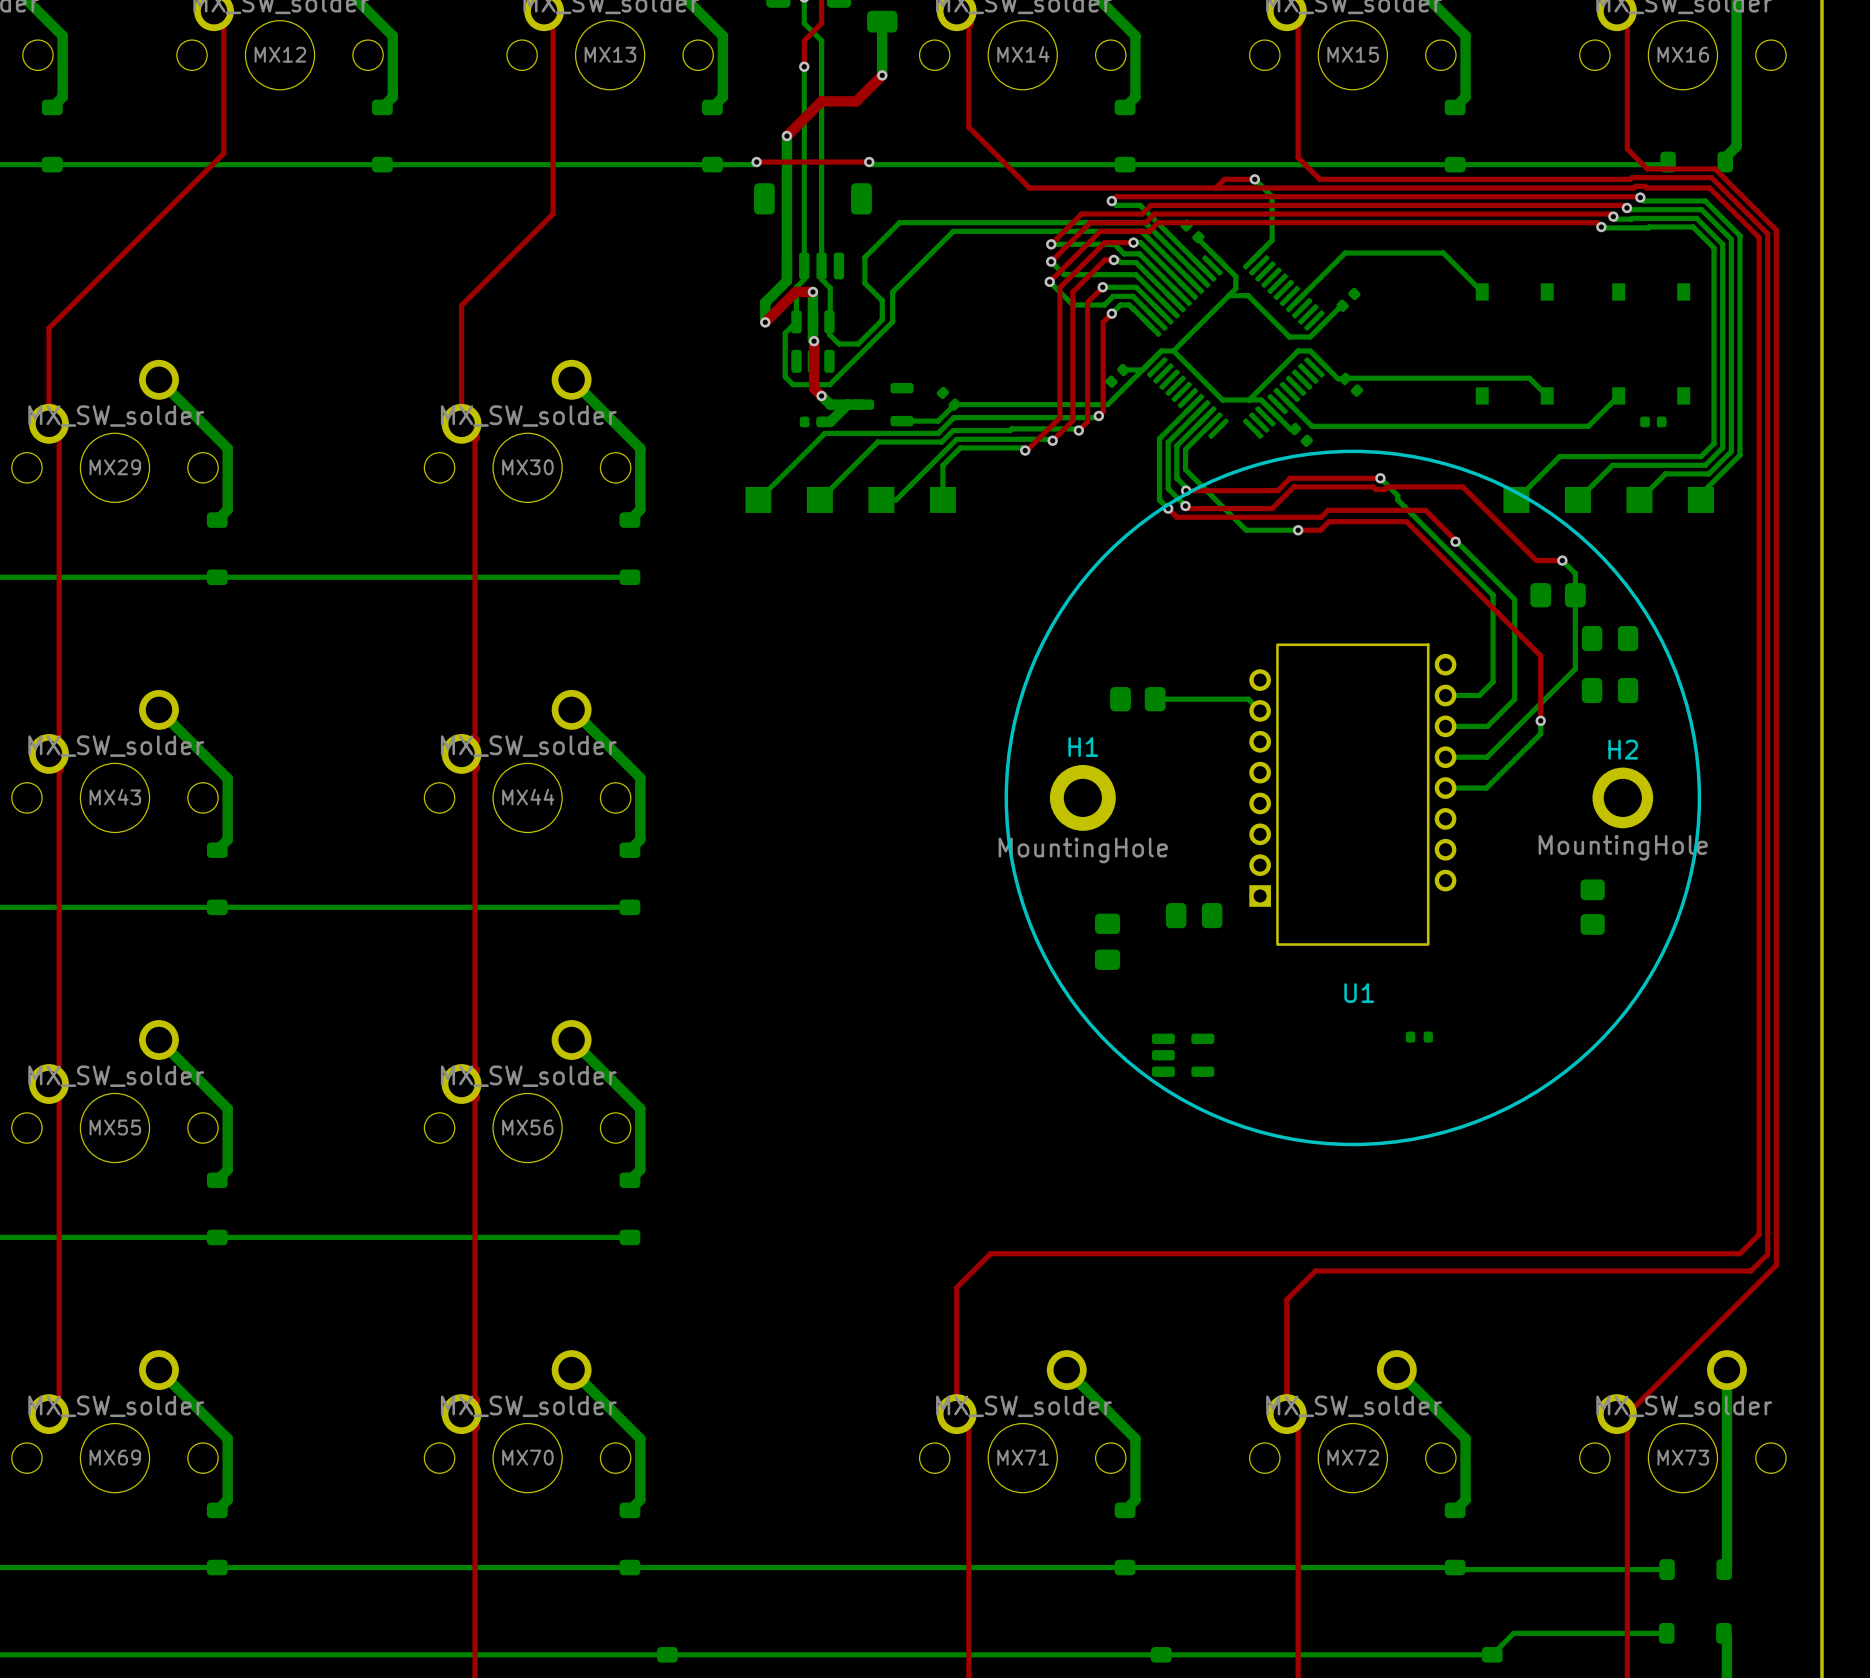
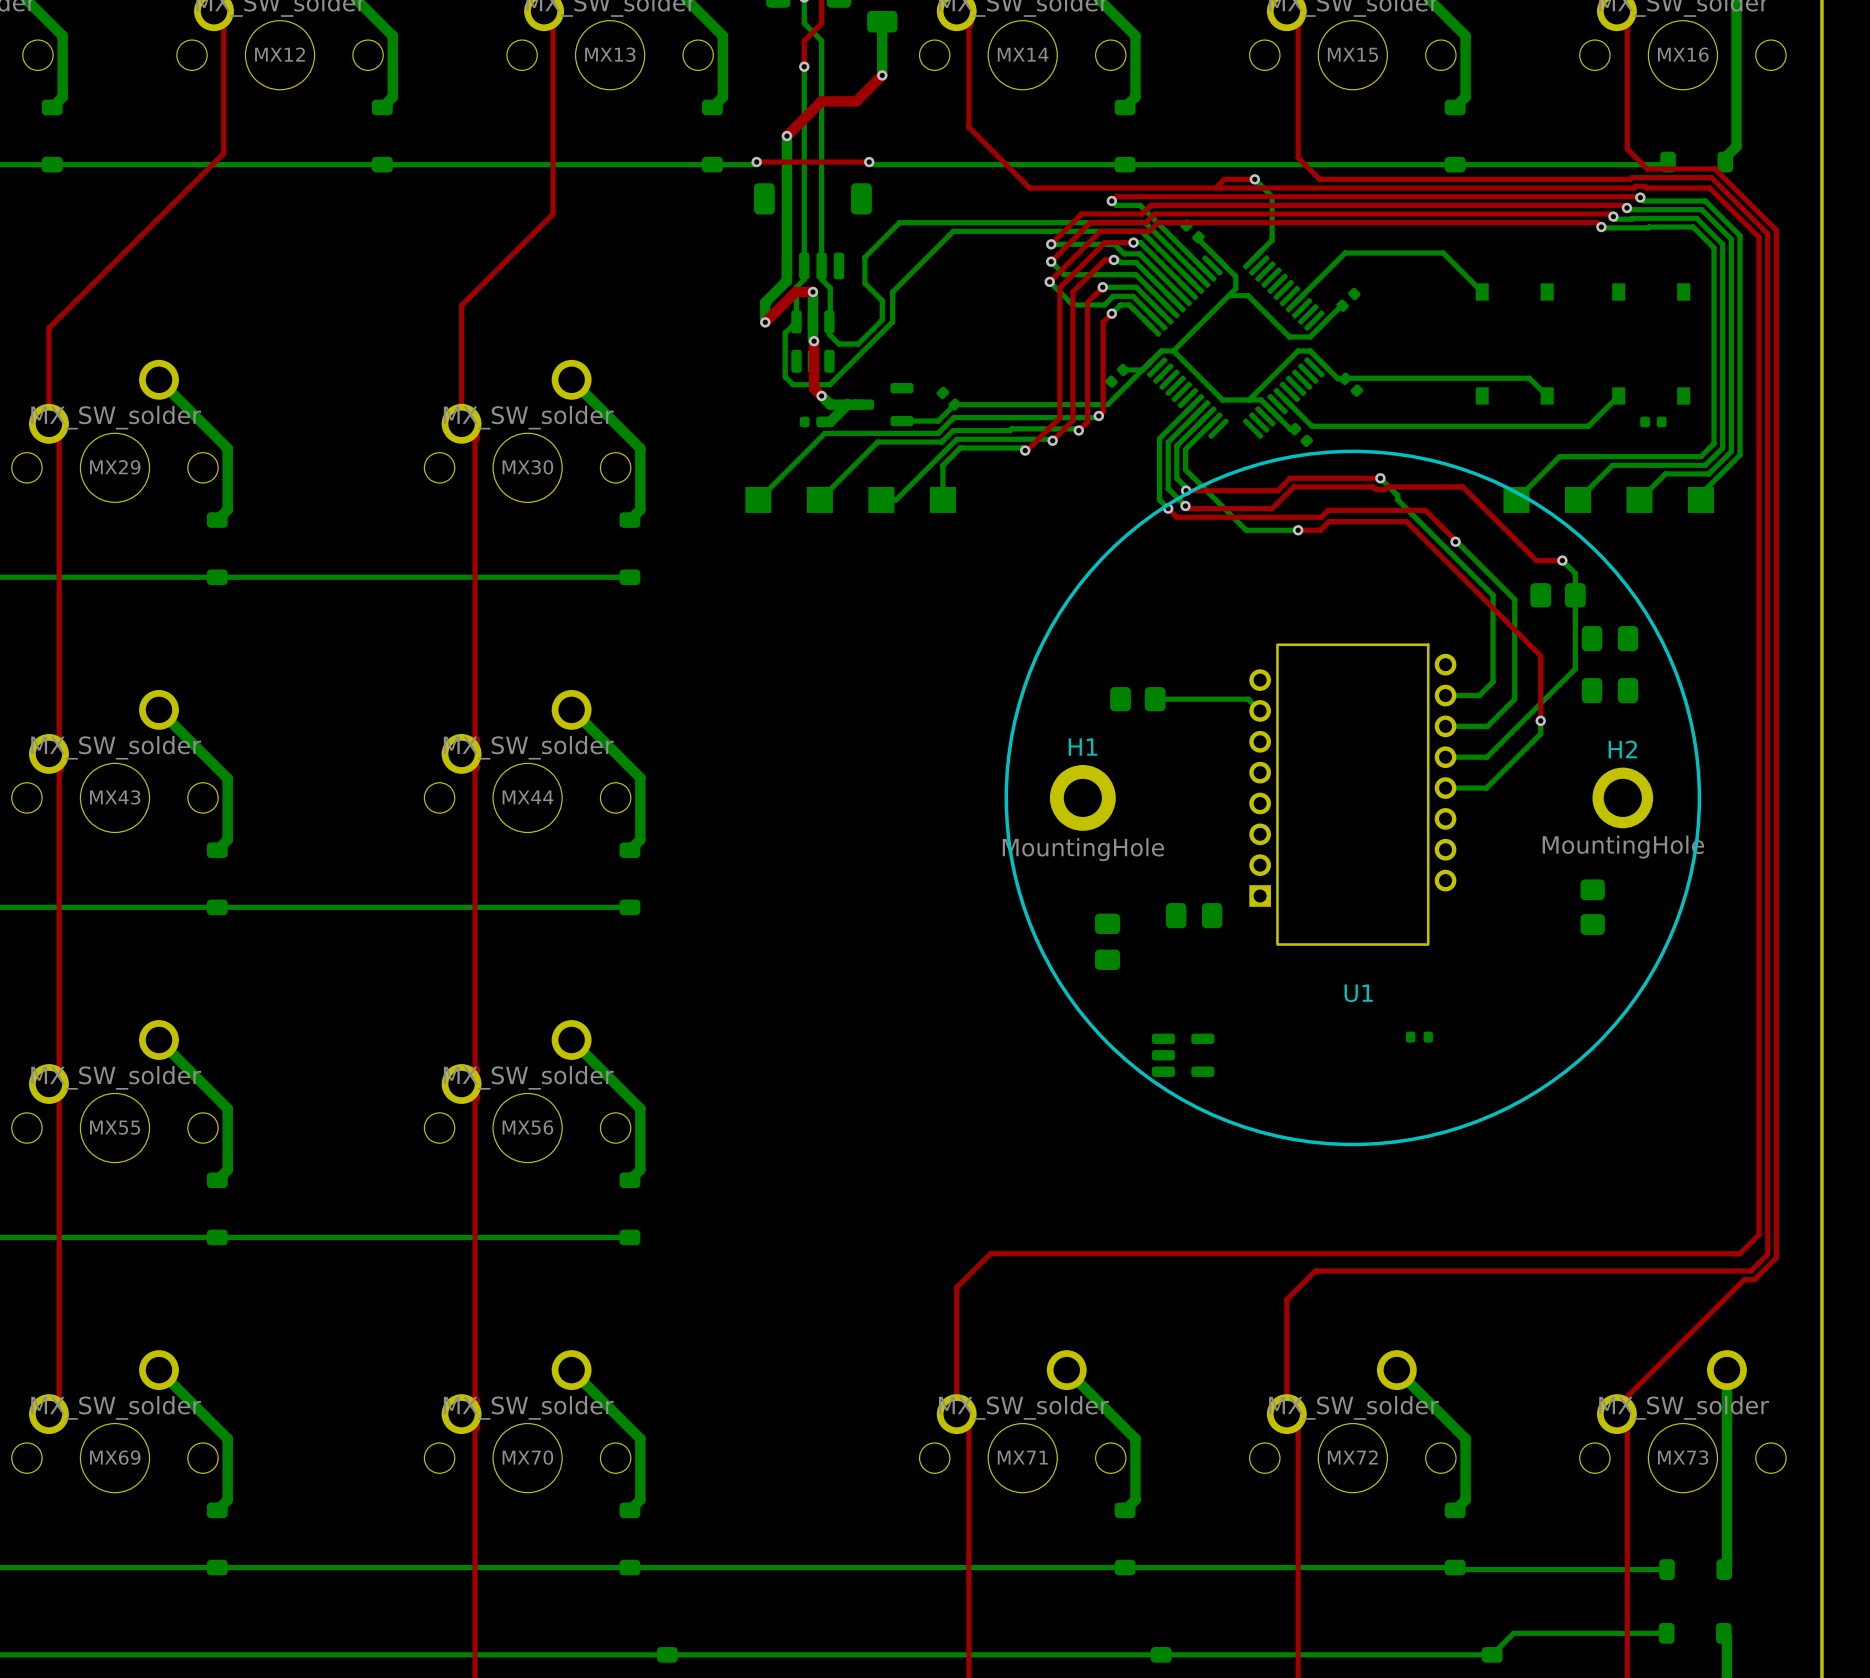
top track: (1776, 1257) (1776, 1265) (1627, 1414) (1616, 1414) -> (1776, 1257) (1754, 1279) (1744, 1279) (1616, 1407) (1616, 1413)

